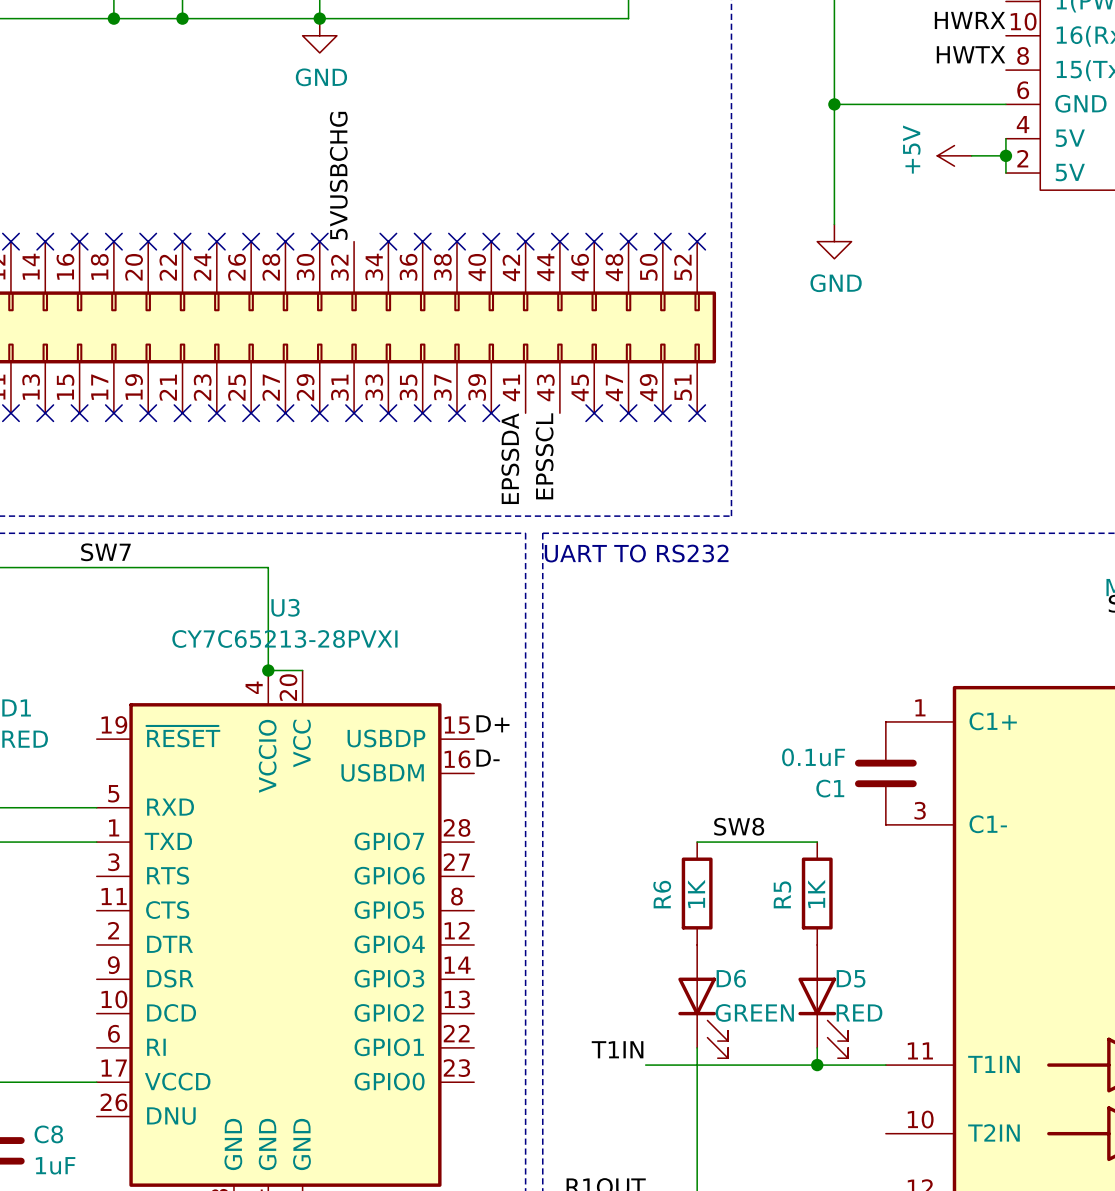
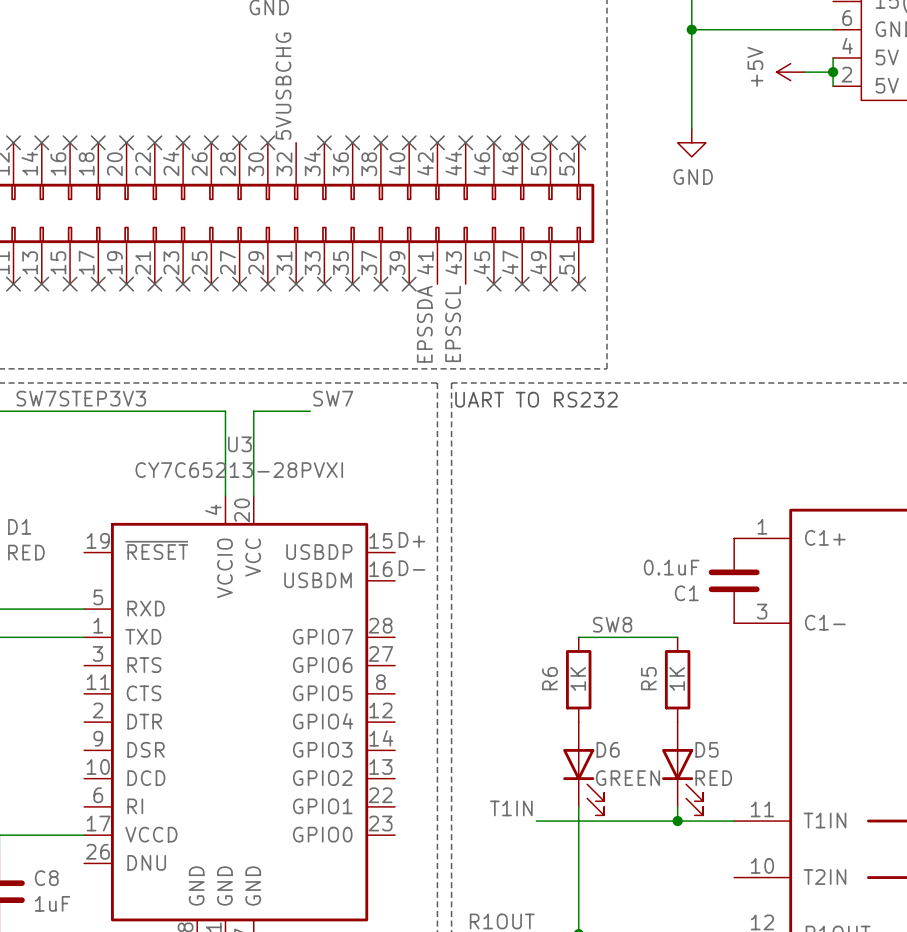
label: none -> SW7STEP3V3 (81, 398)
label position: SW7 (105, 552) -> SW7 (333, 398)
wire: (268, 670) (302, 670) -> (310, 411) (253, 411) (253, 496)
junction: (268, 670) -> none

